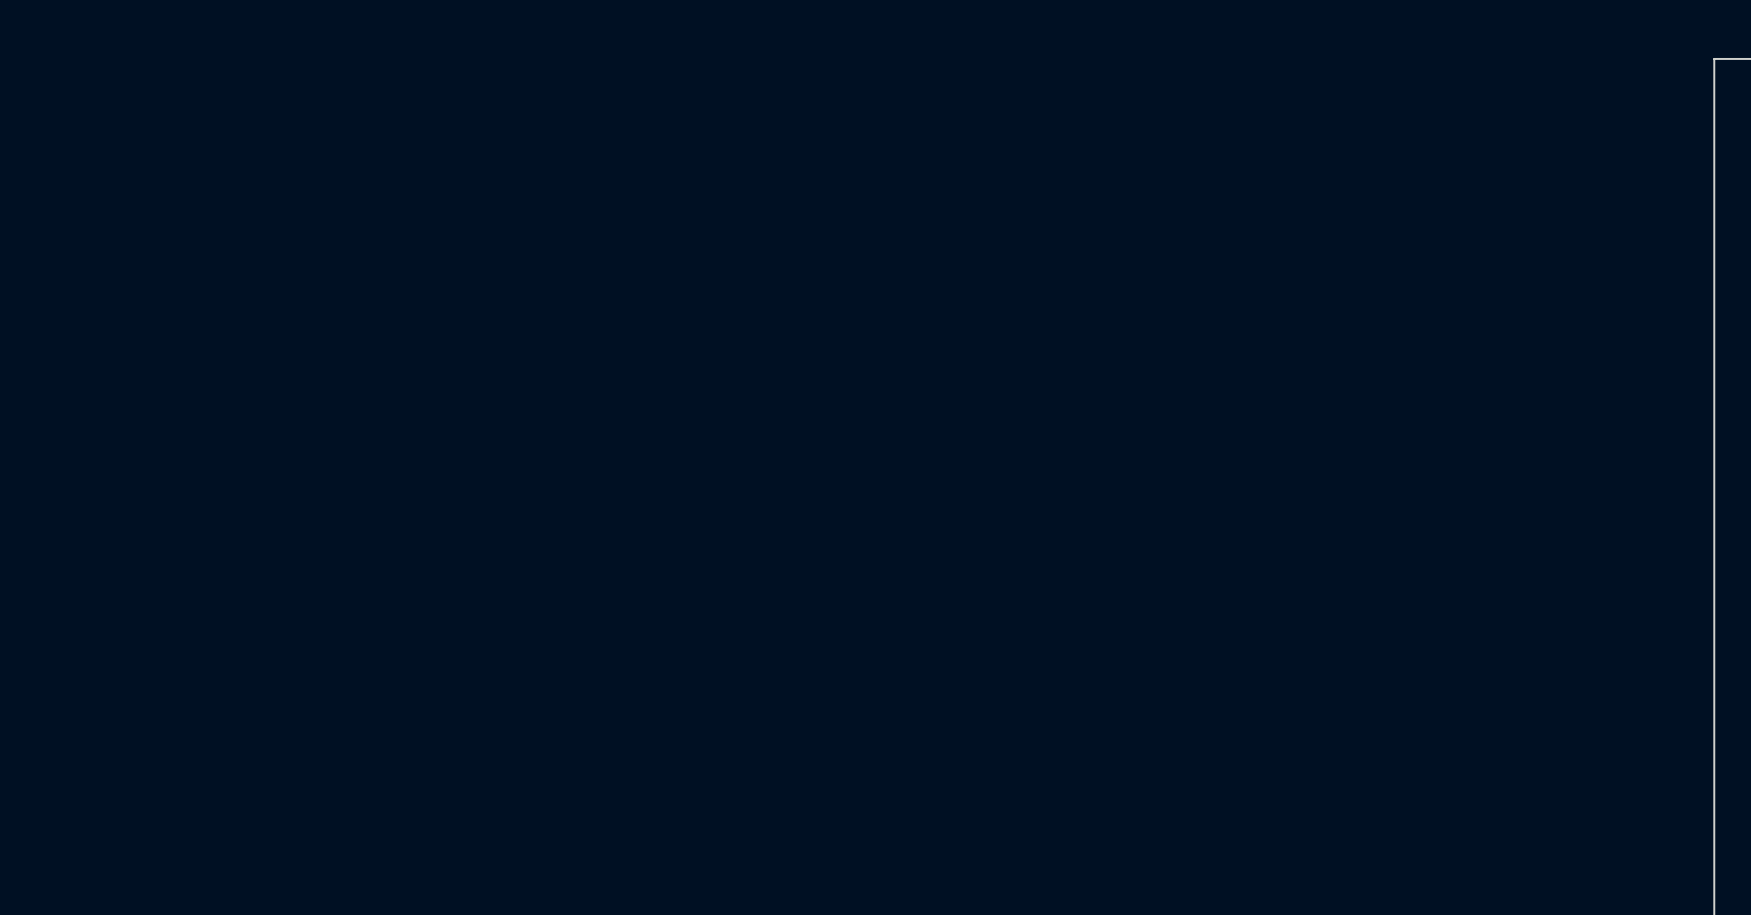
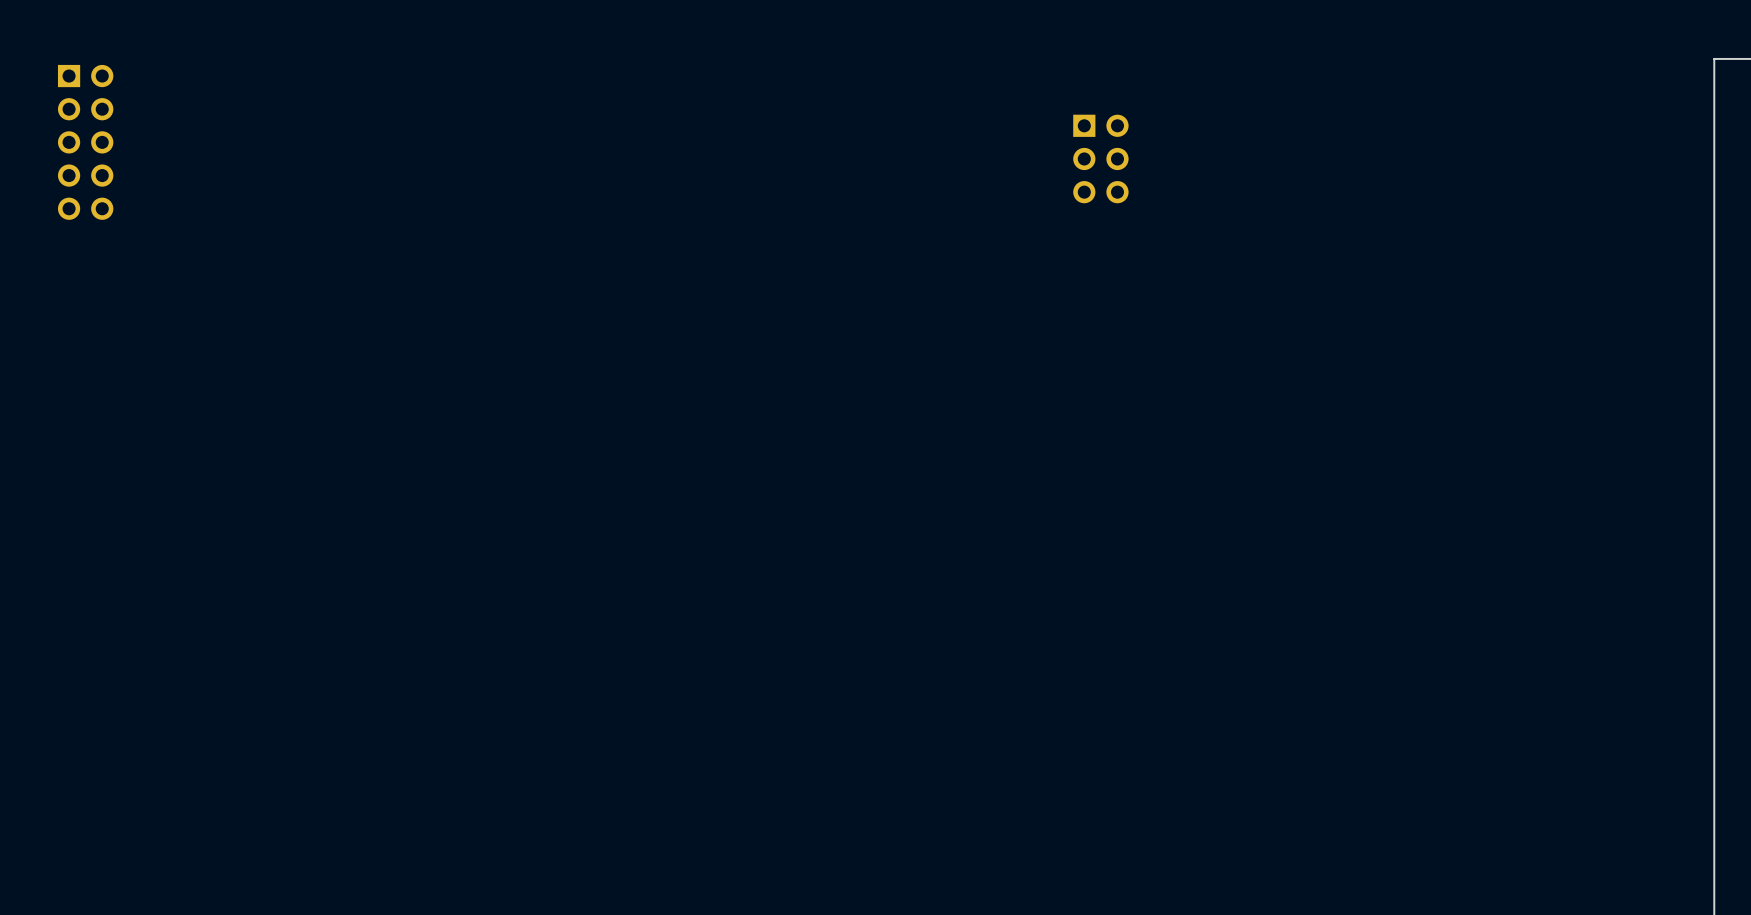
part: none -> (85, 142)
part: none -> (1100, 158)

